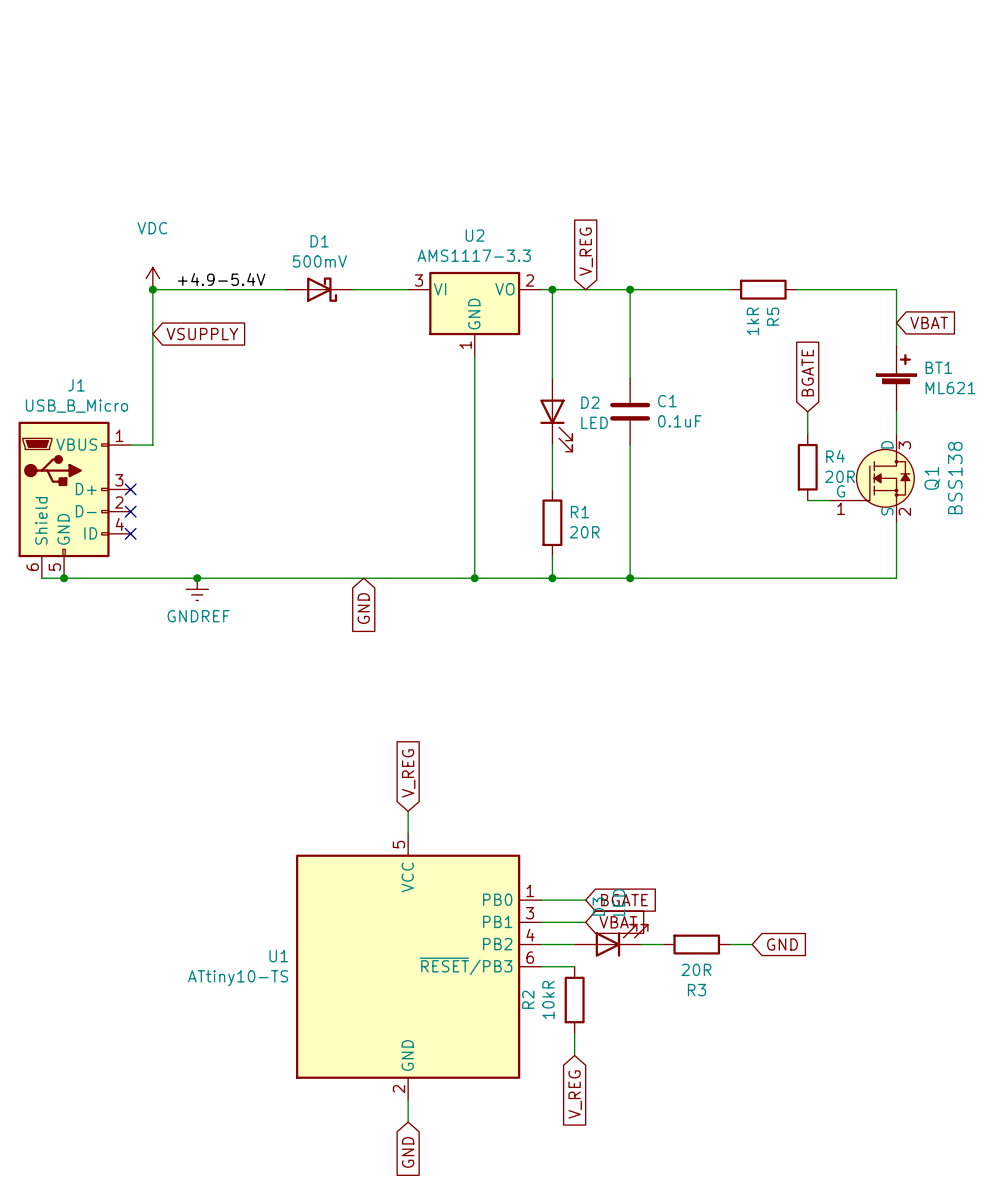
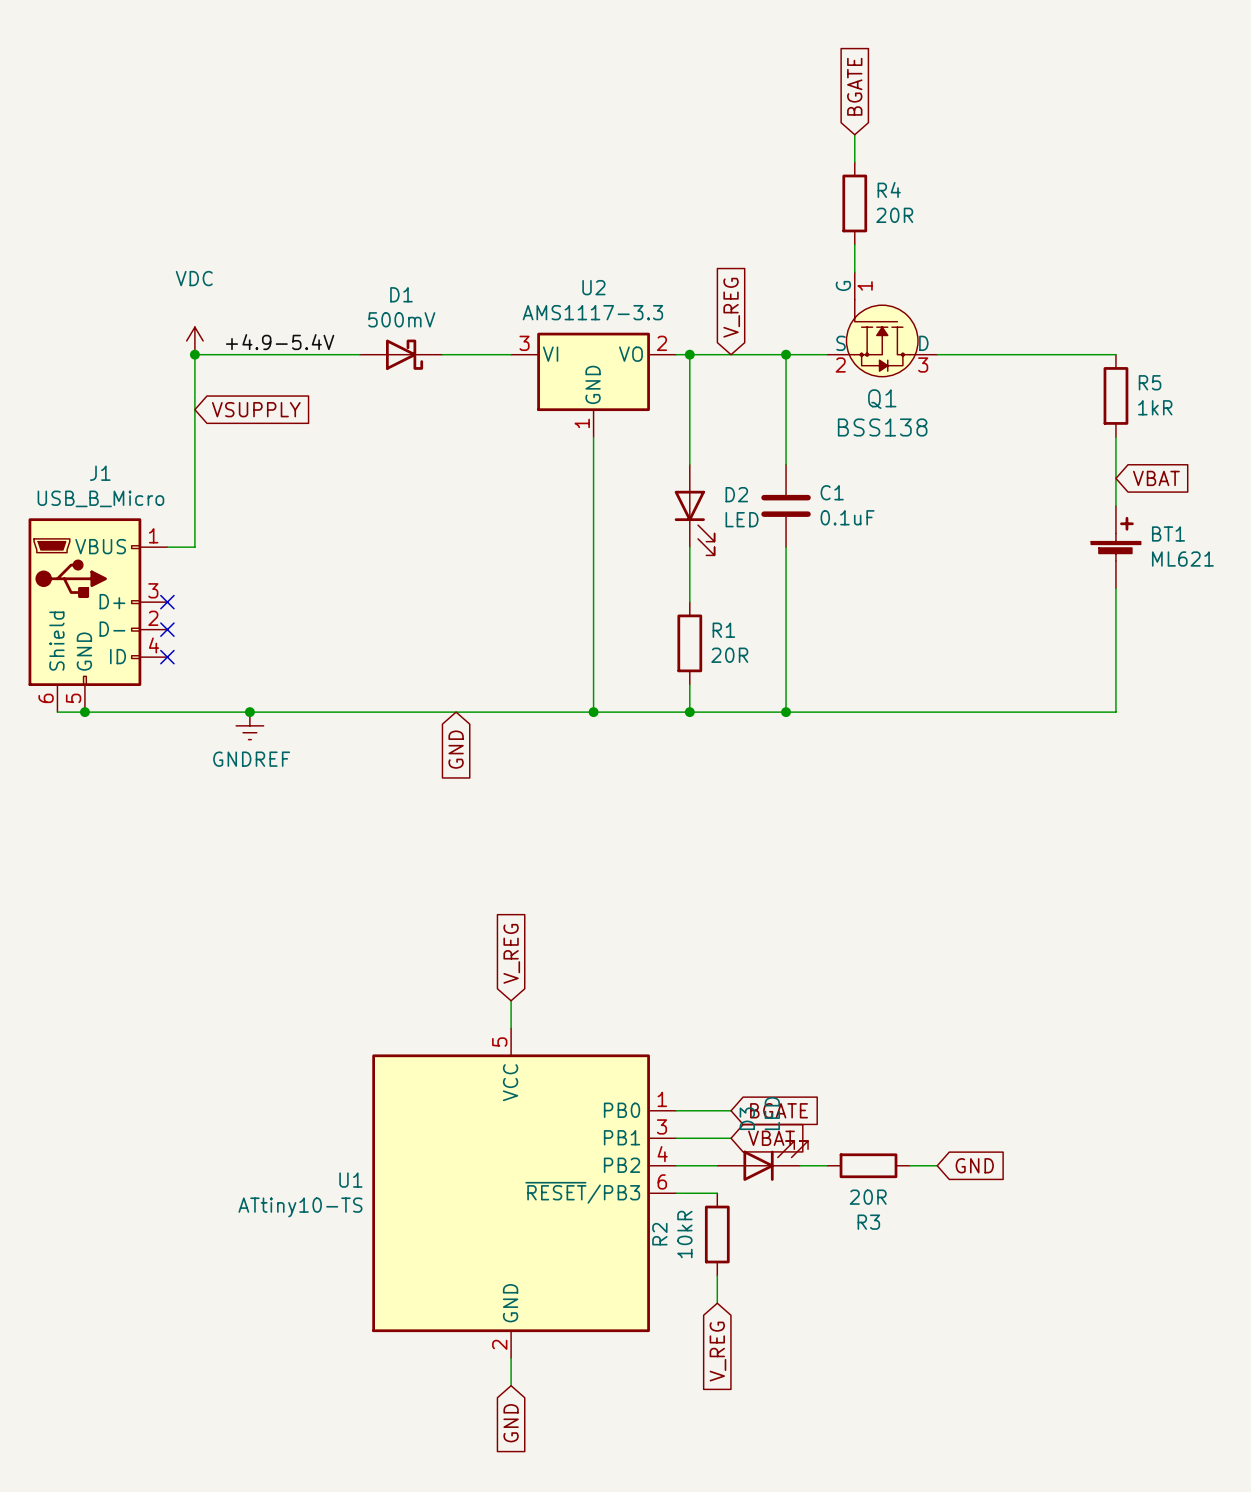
global label: none -> BGATE (854, 86)
wire: none -> (854, 134) (854, 162)
wire: none -> (854, 244) (854, 272)
wire: none -> (937, 354) (992, 354)
R5 rotation: 0° (763, 289) -> 90° clockwise (1115, 395)
R5 position: (763, 289) -> (1115, 395)
wire: (896, 289) (896, 345) -> none
R5 name position: R5 (773, 316) -> R5 (1150, 382)
R5 value position: 1kR (752, 321) -> 1kR (1155, 407)
global label position: VBAT (929, 322) -> VBAT (1156, 478)
global label: BGATE (807, 373) -> none
BT1 position: (896, 378) -> (1115, 547)
wire: (807, 411) (807, 433) -> none
R4 position: (807, 467) -> (854, 203)
Q1 position: (872, 478) -> (882, 324)
Q1 rotation: 0° (883, 478) -> 90° clockwise (882, 338)
wire: (807, 500) (829, 500) -> none

